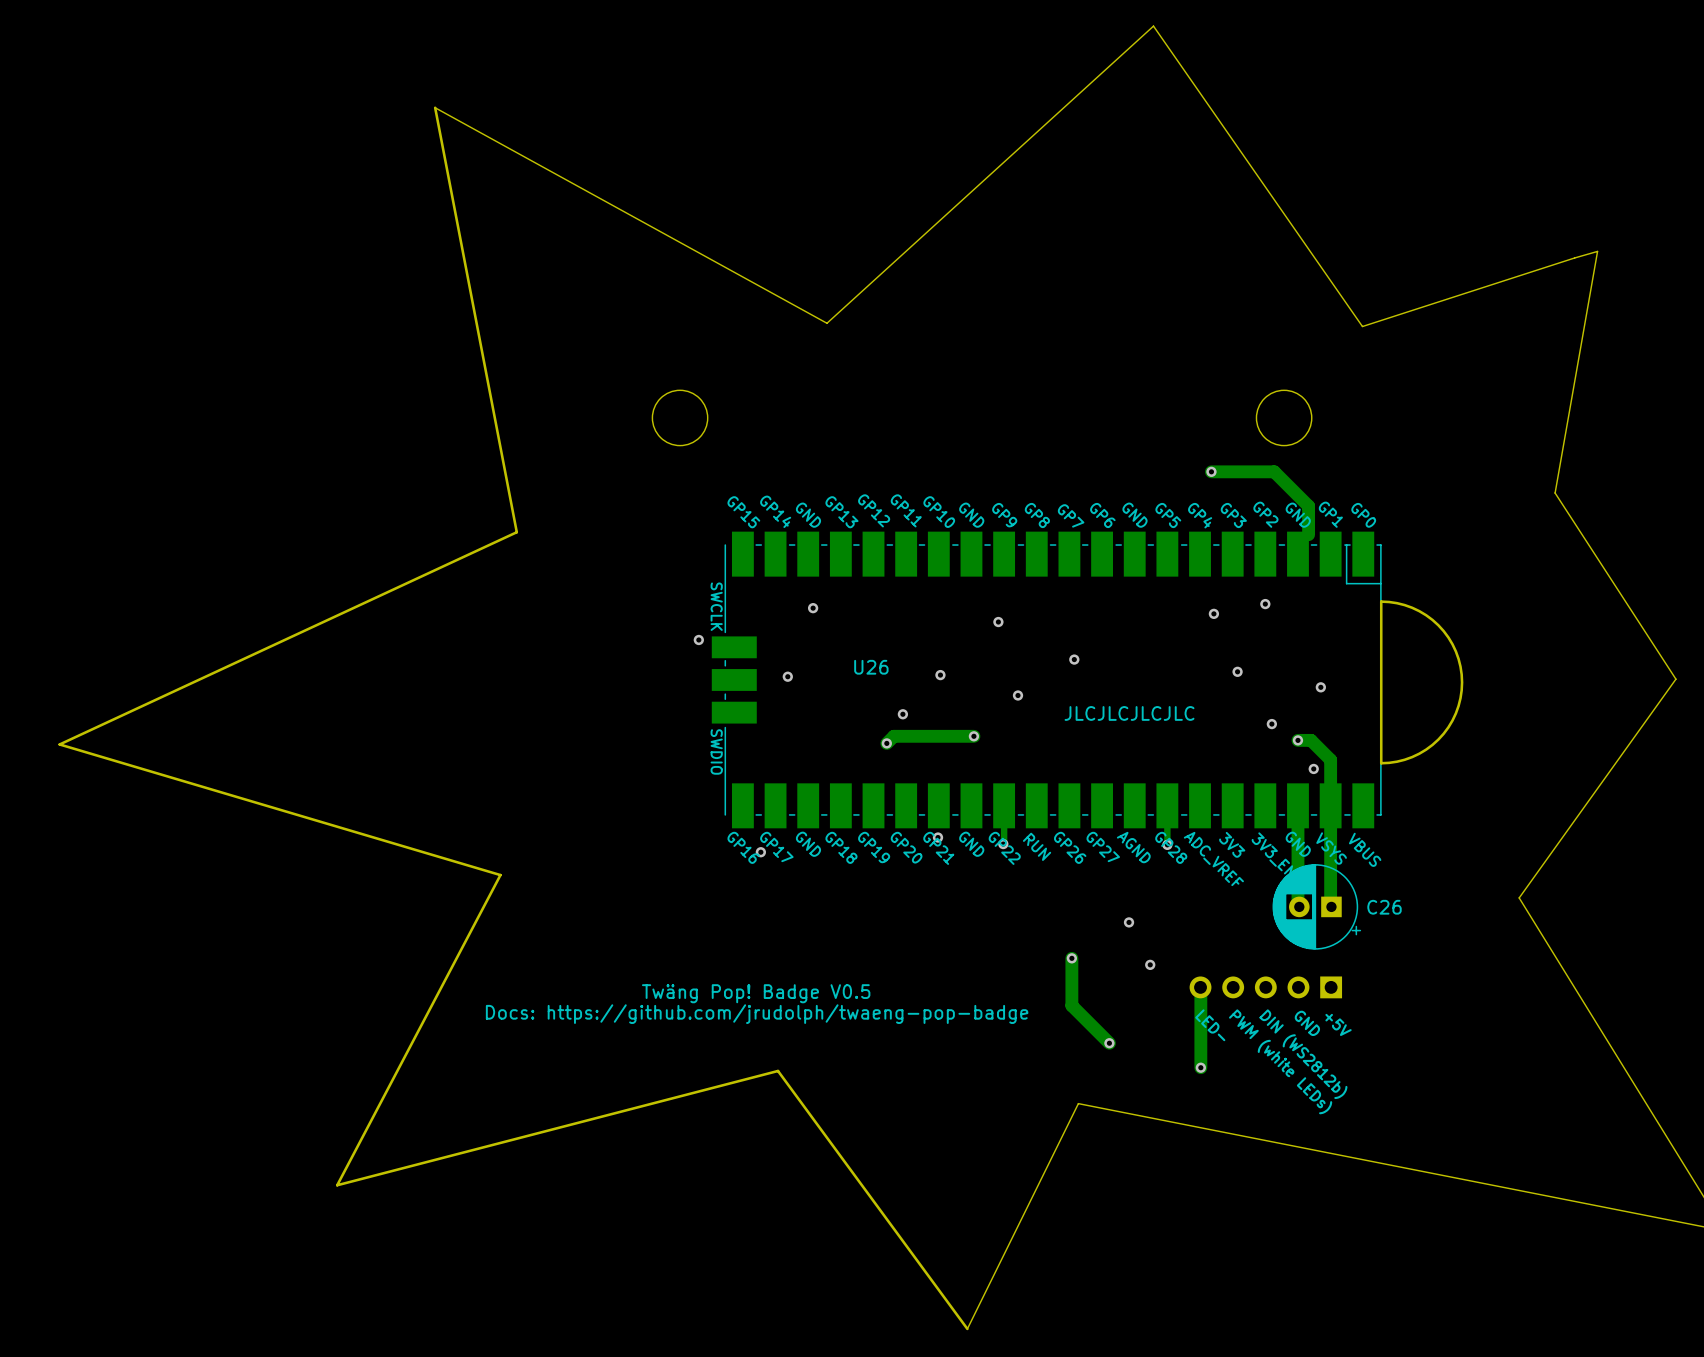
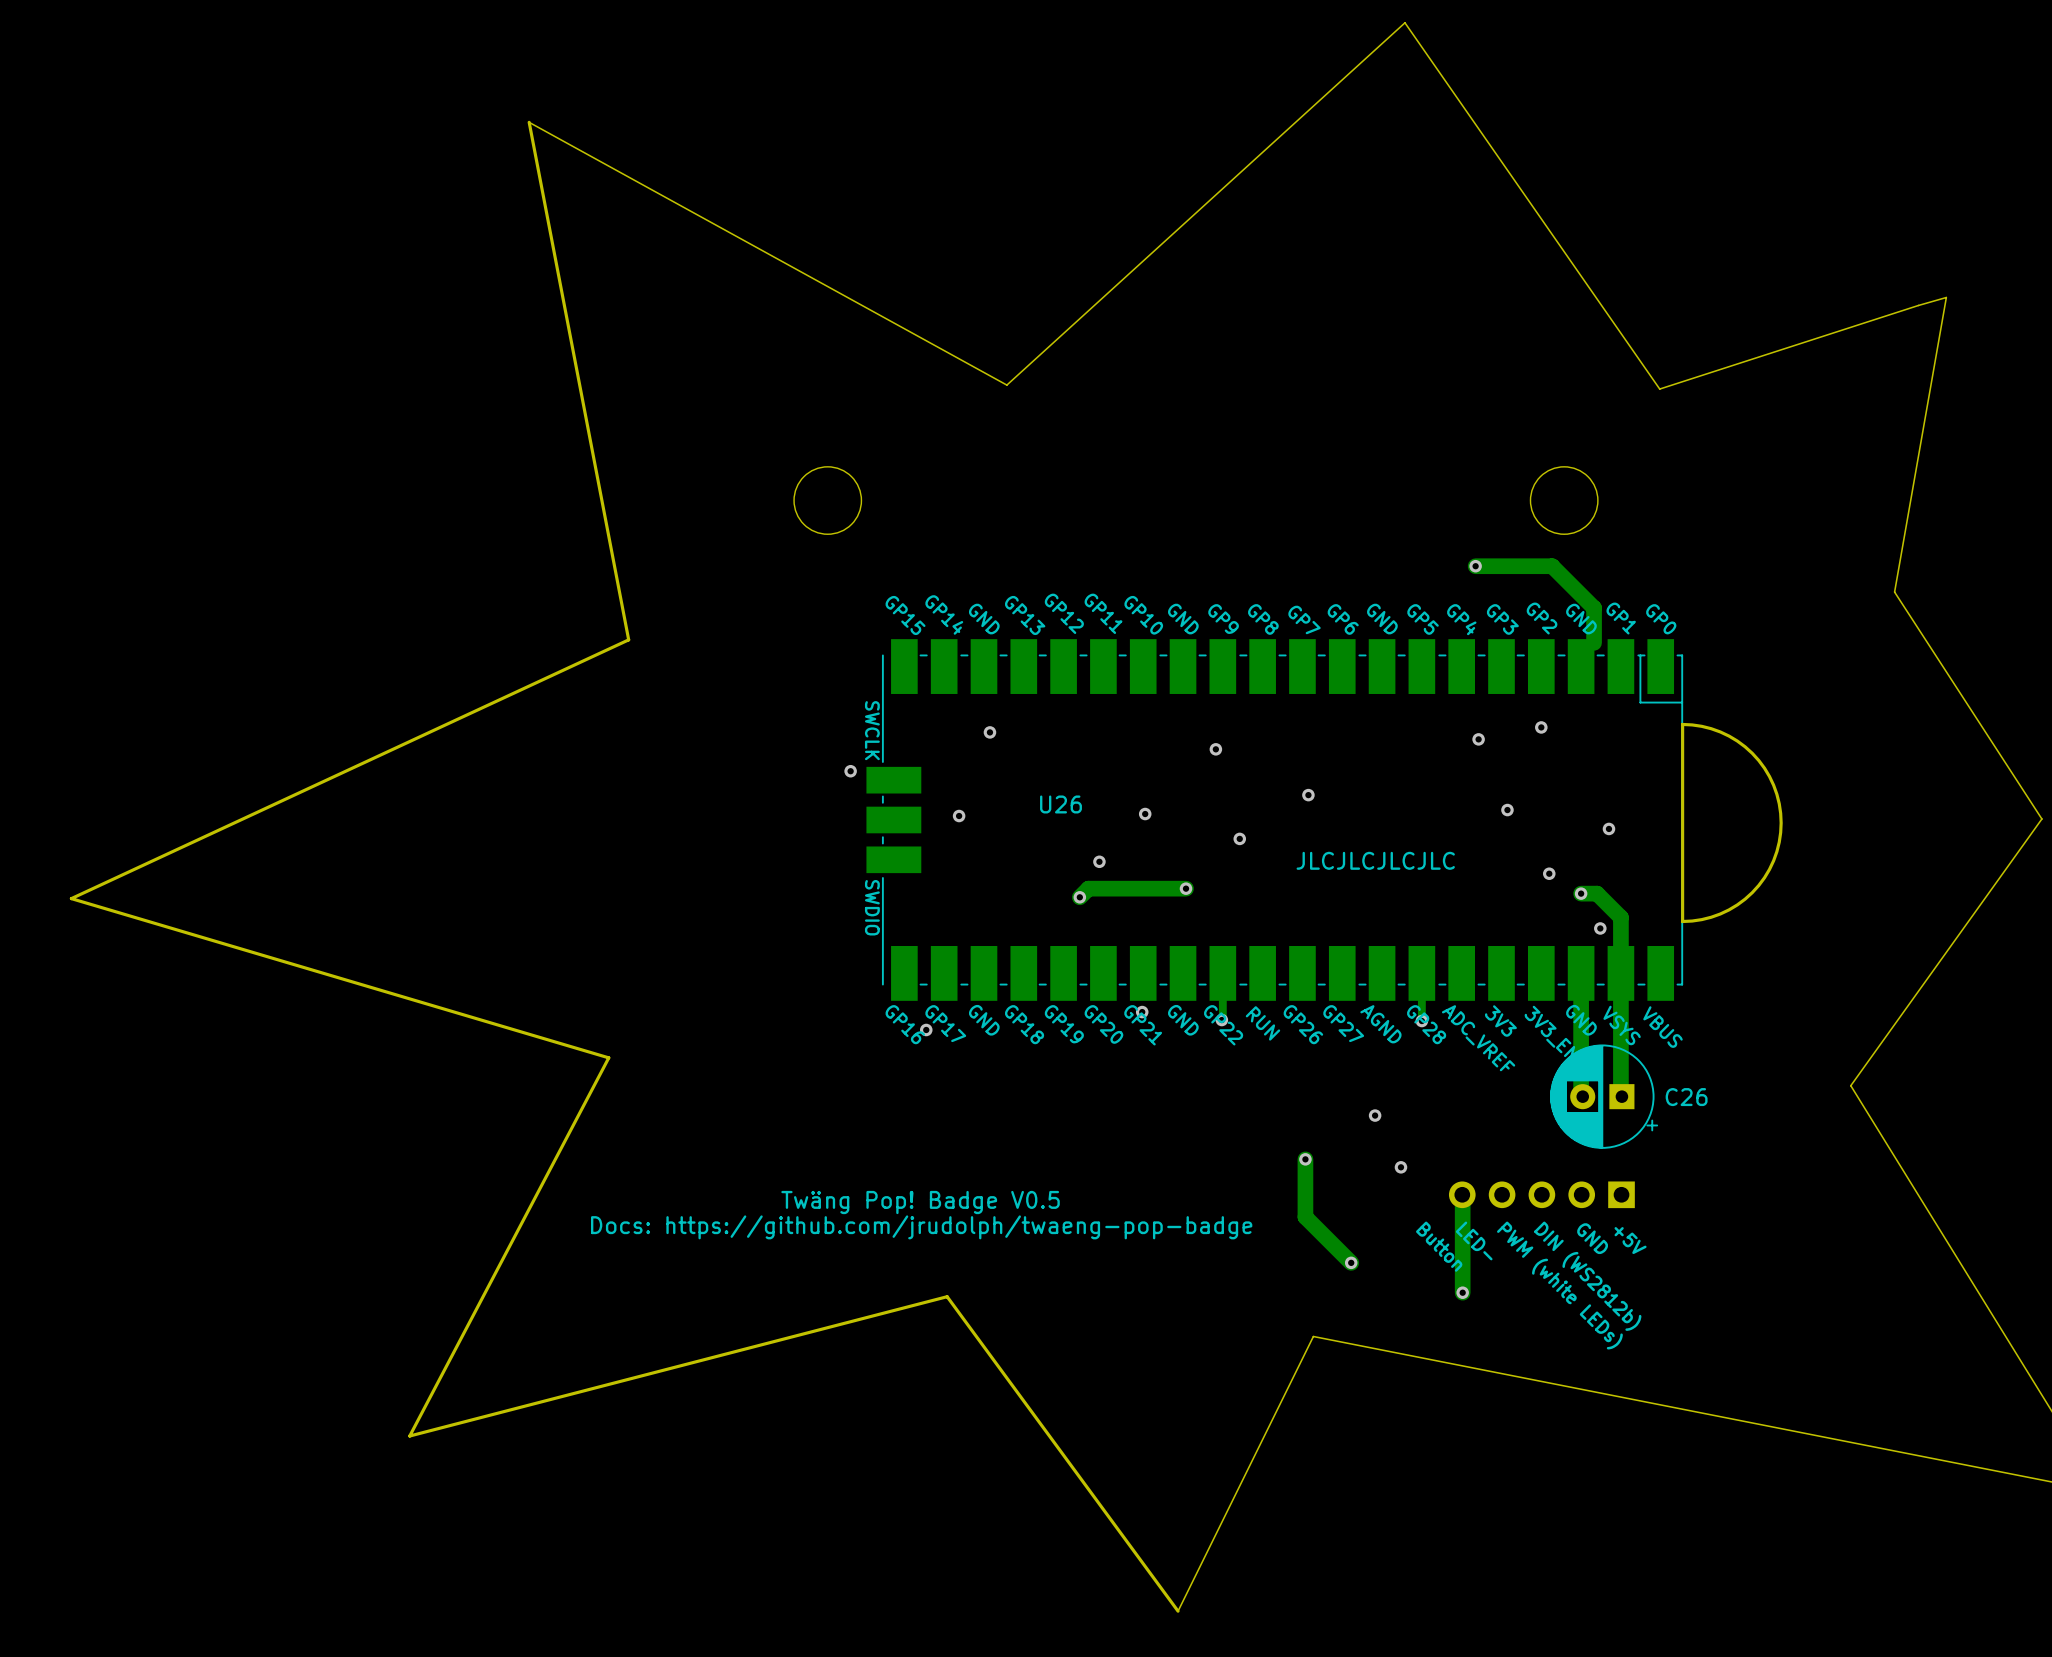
text: none -> Button (1439, 1246)

